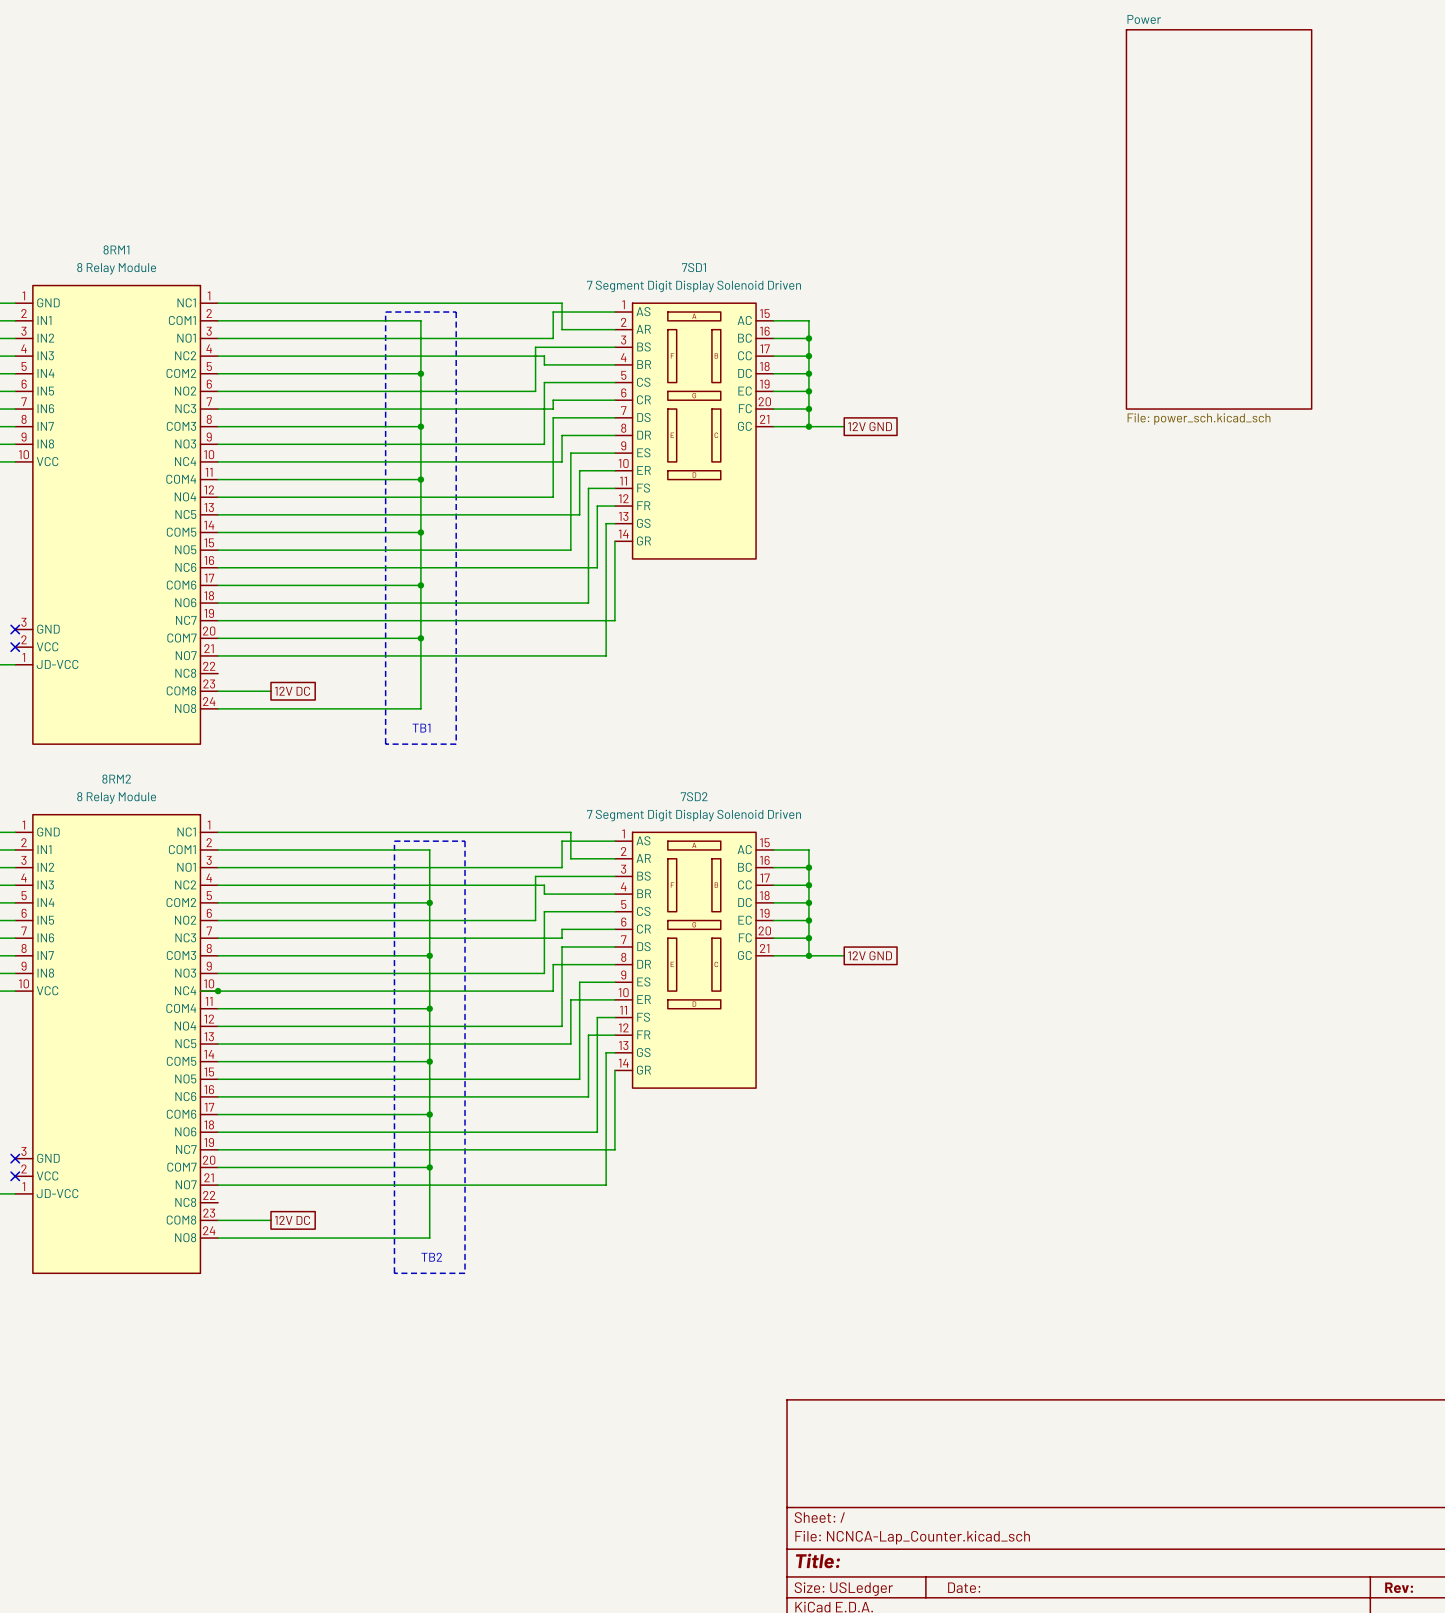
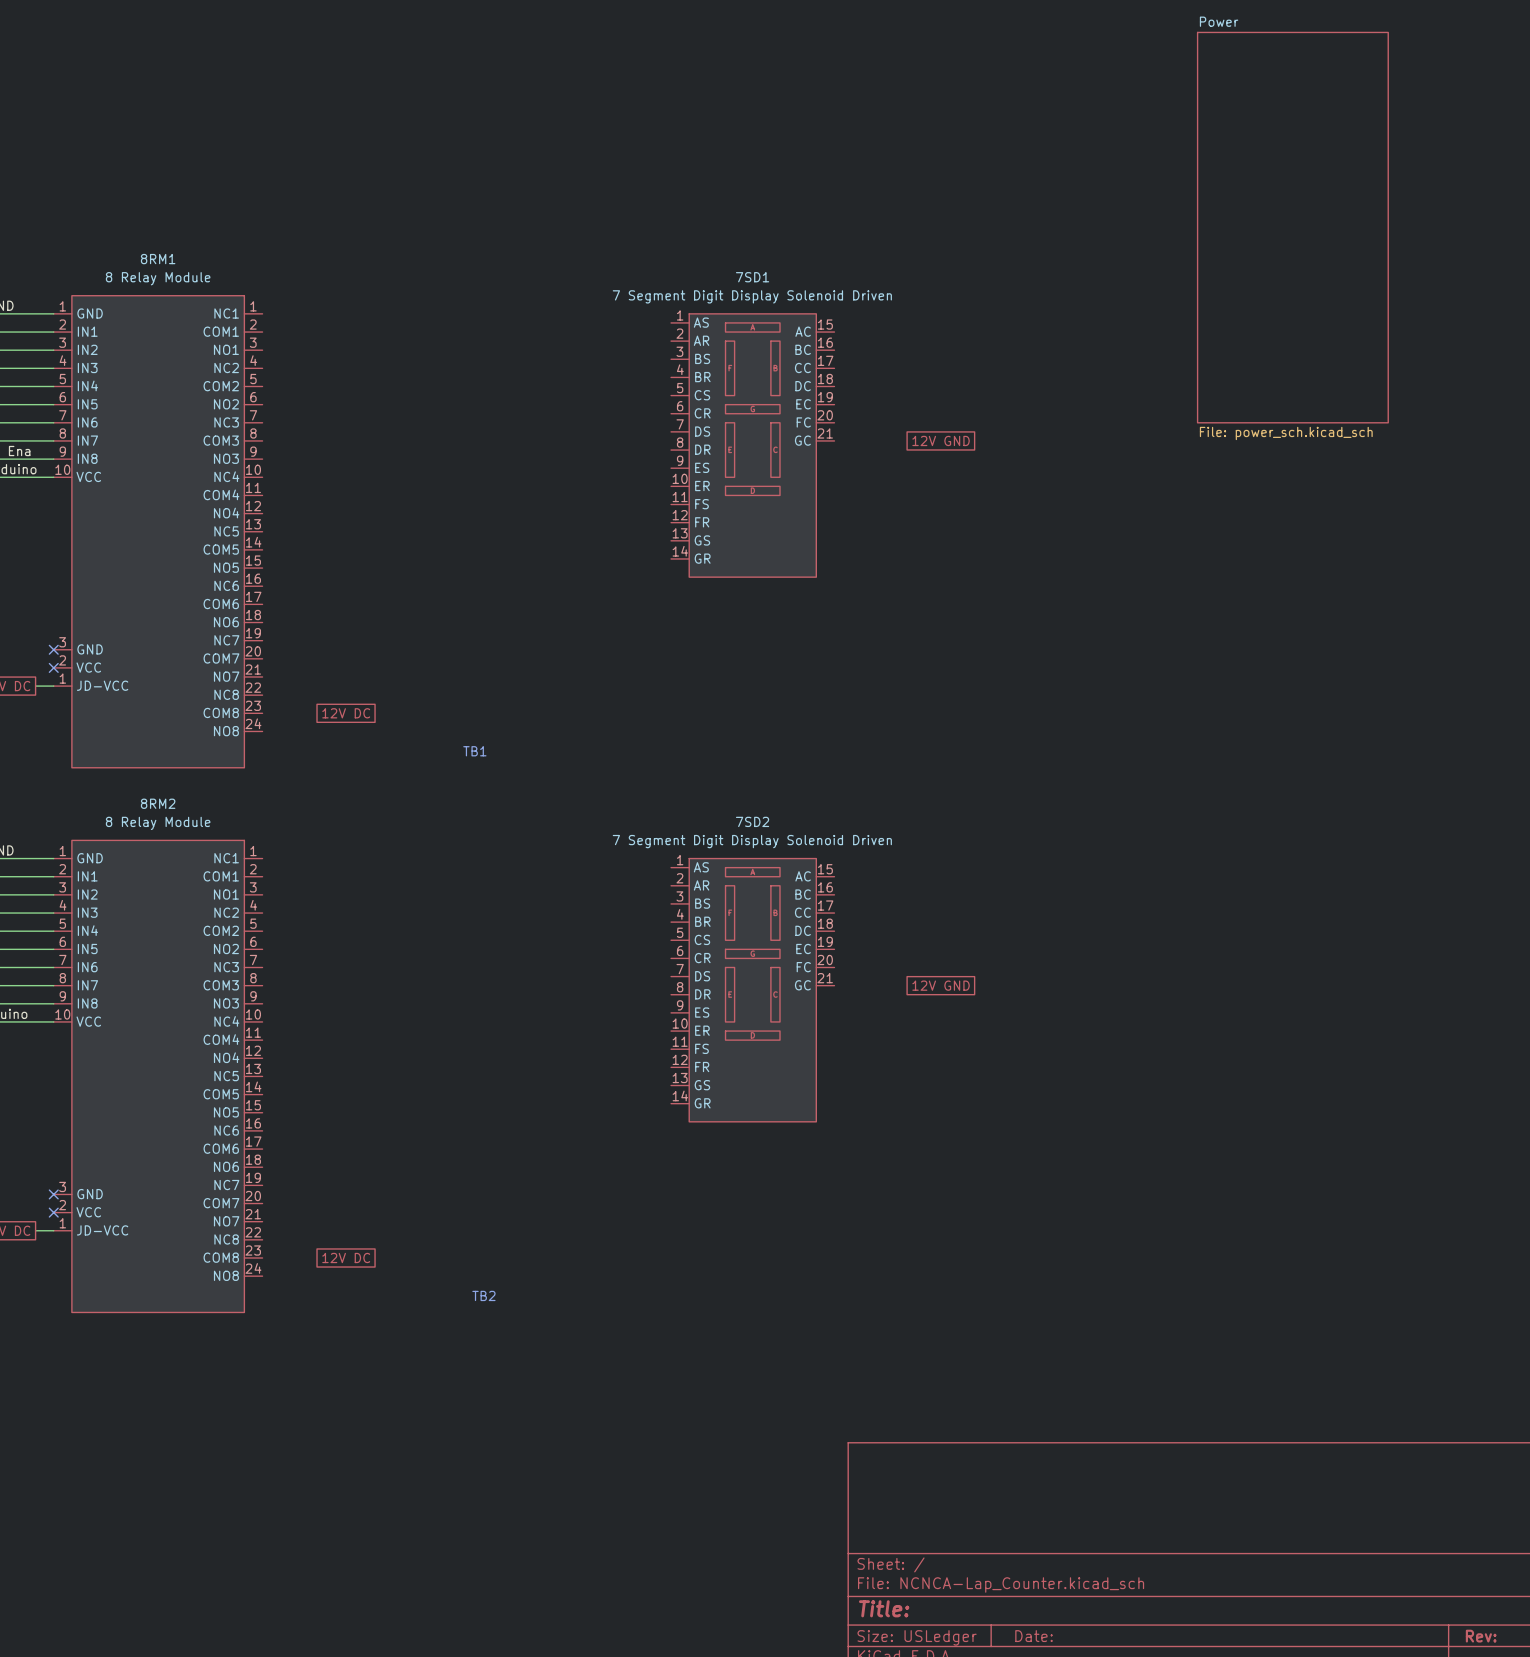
wire: (218, 303) (562, 303) (562, 329) (614, 329) -> none
line: (385, 312) (456, 312) (456, 744) (385, 744) (385, 312) -> none
wire: (614, 312) (553, 312) (553, 338) (218, 338) -> none
wire: (218, 320) (420, 320) (420, 708) (218, 708) -> none
wire: (773, 320) (808, 320) (808, 426) -> none
wire: (773, 338) (808, 338) -> none
junction: (808, 338) -> none
wire: (614, 347) (535, 347) (535, 391) (218, 391) -> none
wire: (218, 356) (544, 356) (544, 364) (614, 364) -> none
wire: (773, 356) (808, 356) -> none
junction: (808, 356) -> none
wire: (218, 373) (420, 373) -> none
junction: (420, 373) -> none
wire: (773, 373) (808, 373) -> none
junction: (808, 373) -> none
wire: (614, 382) (544, 382) (544, 444) (218, 444) -> none
wire: (773, 391) (808, 391) -> none
junction: (808, 391) -> none
wire: (614, 400) (553, 400) (553, 409) (218, 409) -> none
wire: (773, 409) (808, 409) -> none
junction: (808, 409) -> none
wire: (614, 417) (553, 417) (553, 497) (218, 497) -> none
wire: (218, 426) (420, 426) -> none
junction: (420, 426) -> none
wire: (773, 426) (844, 426) -> none
junction: (808, 426) -> none
wire: (614, 435) (562, 435) (562, 461) (218, 461) -> none
wire: (614, 453) (570, 453) (570, 550) (218, 550) -> none
wire: (614, 470) (579, 470) (579, 514) (218, 514) -> none
wire: (218, 479) (420, 479) -> none
junction: (420, 479) -> none
wire: (614, 488) (588, 488) (588, 603) (218, 603) -> none
wire: (614, 506) (597, 506) (597, 567) (218, 567) -> none
wire: (614, 523) (606, 523) (606, 655) (218, 655) -> none
wire: (218, 532) (420, 532) -> none
junction: (420, 532) -> none
wire: (614, 541) (614, 620) (218, 620) -> none
wire: (218, 585) (420, 585) -> none
junction: (420, 585) -> none
wire: (218, 638) (420, 638) -> none
junction: (420, 638) -> none
wire: (218, 691) (270, 691) -> none
wire: (218, 832) (570, 832) (570, 858) (614, 858) -> none
line: (394, 841) (465, 841) (465, 1273) (394, 1273) (394, 841) -> none
wire: (614, 841) (562, 841) (562, 867) (218, 867) -> none
wire: (218, 849) (429, 849) (429, 1238) (218, 1238) -> none
wire: (773, 849) (808, 849) (808, 955) -> none
wire: (773, 867) (808, 867) -> none
junction: (808, 867) -> none
wire: (614, 876) (535, 876) (535, 920) (218, 920) -> none
wire: (218, 885) (544, 885) (544, 894) (614, 894) -> none
wire: (773, 885) (808, 885) -> none
junction: (808, 885) -> none
wire: (218, 902) (429, 902) -> none
junction: (429, 902) -> none
wire: (773, 902) (808, 902) -> none
junction: (808, 902) -> none
wire: (614, 911) (544, 911) (544, 973) (218, 973) -> none
wire: (773, 920) (808, 920) -> none
junction: (808, 920) -> none
wire: (614, 929) (562, 929) (562, 938) (218, 938) -> none
wire: (773, 938) (808, 938) -> none
junction: (808, 938) -> none
wire: (614, 946) (562, 946) (562, 1026) (218, 1026) -> none
wire: (218, 955) (429, 955) -> none
junction: (429, 955) -> none
wire: (773, 955) (844, 955) -> none
junction: (808, 955) -> none
wire: (614, 964) (553, 964) (553, 991) (200, 991) -> none
wire: (614, 982) (579, 982) (579, 1079) (218, 1079) -> none
junction: (218, 991) -> none
wire: (614, 999) (570, 999) (570, 1044) (218, 1044) -> none
wire: (218, 1008) (429, 1008) -> none
junction: (429, 1008) -> none
wire: (614, 1017) (597, 1017) (597, 1132) (218, 1132) -> none
wire: (614, 1035) (588, 1035) (588, 1096) (218, 1096) -> none
wire: (614, 1052) (606, 1052) (606, 1185) (218, 1185) -> none
wire: (218, 1061) (429, 1061) -> none
junction: (429, 1061) -> none
wire: (614, 1070) (614, 1149) (218, 1149) -> none
wire: (218, 1114) (429, 1114) -> none
junction: (429, 1114) -> none
wire: (218, 1167) (429, 1167) -> none
junction: (429, 1167) -> none
wire: (218, 1220) (270, 1220) -> none

